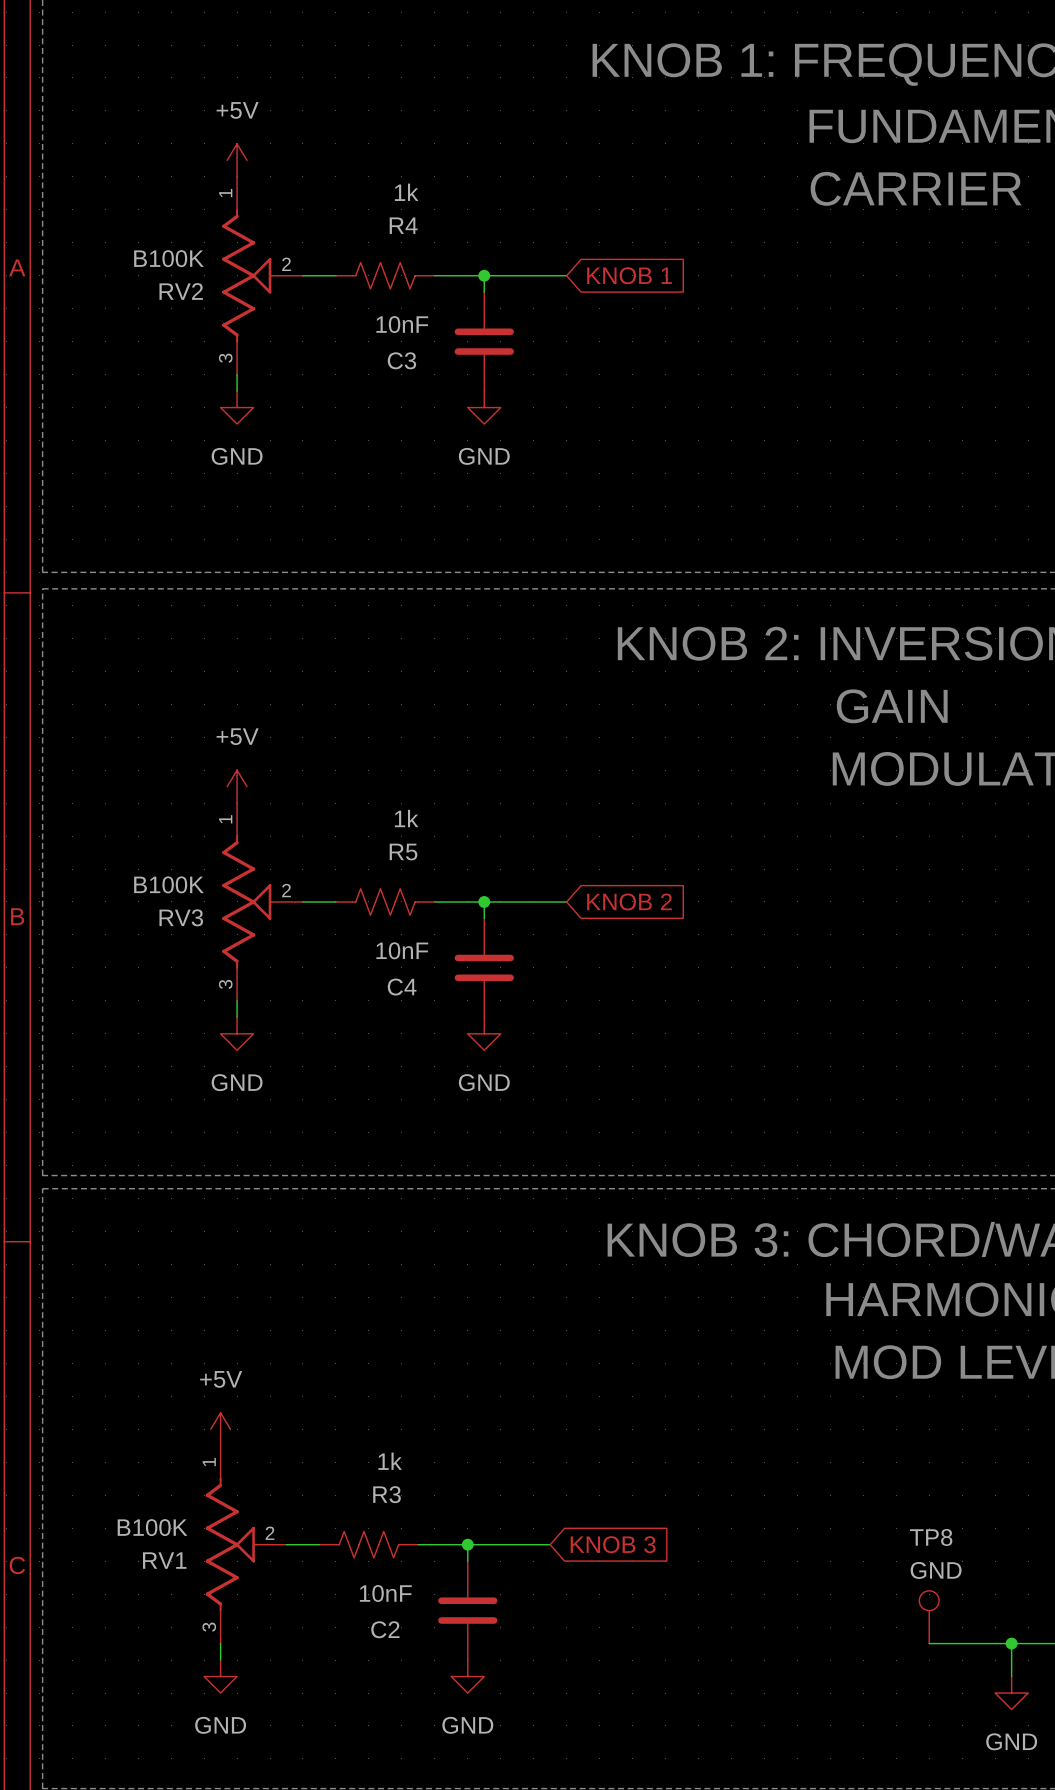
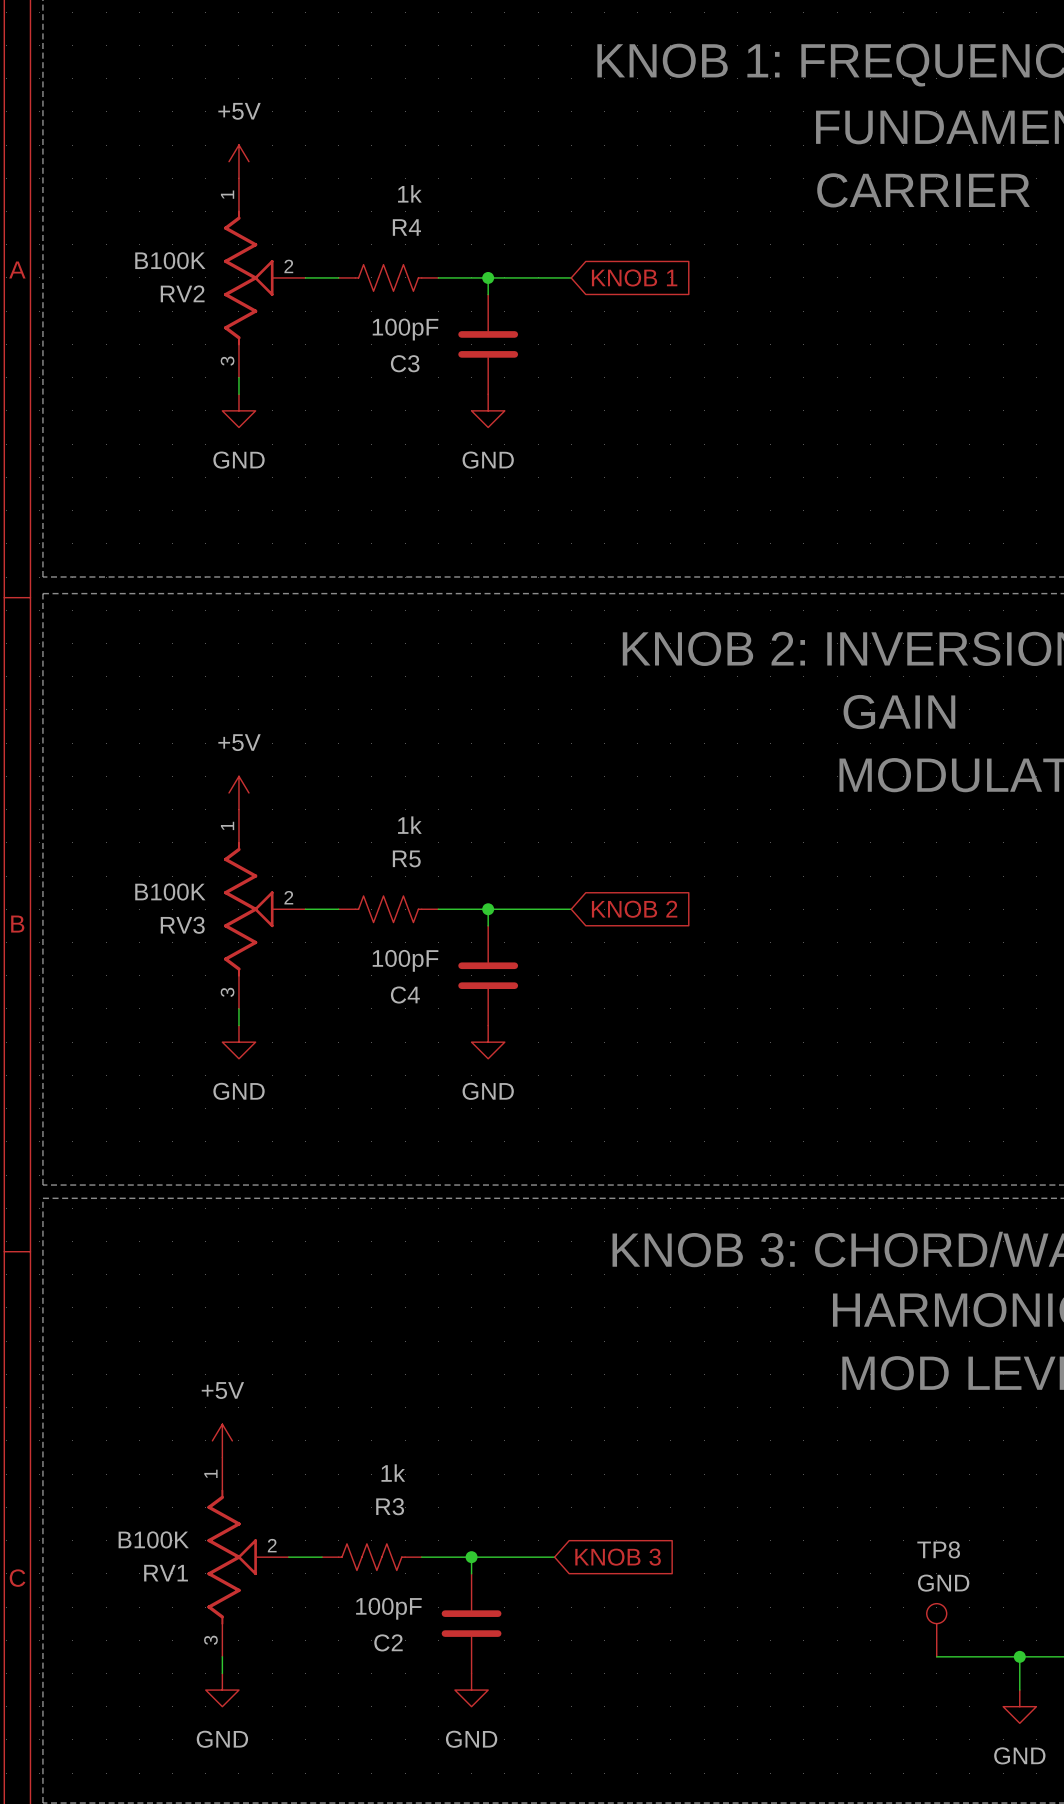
C3 value: 10nF (402, 324) -> 100pF (405, 329)
C4 value: 10nF (402, 950) -> 100pF (405, 960)
C2 value: 10nF (385, 1593) -> 100pF (388, 1608)

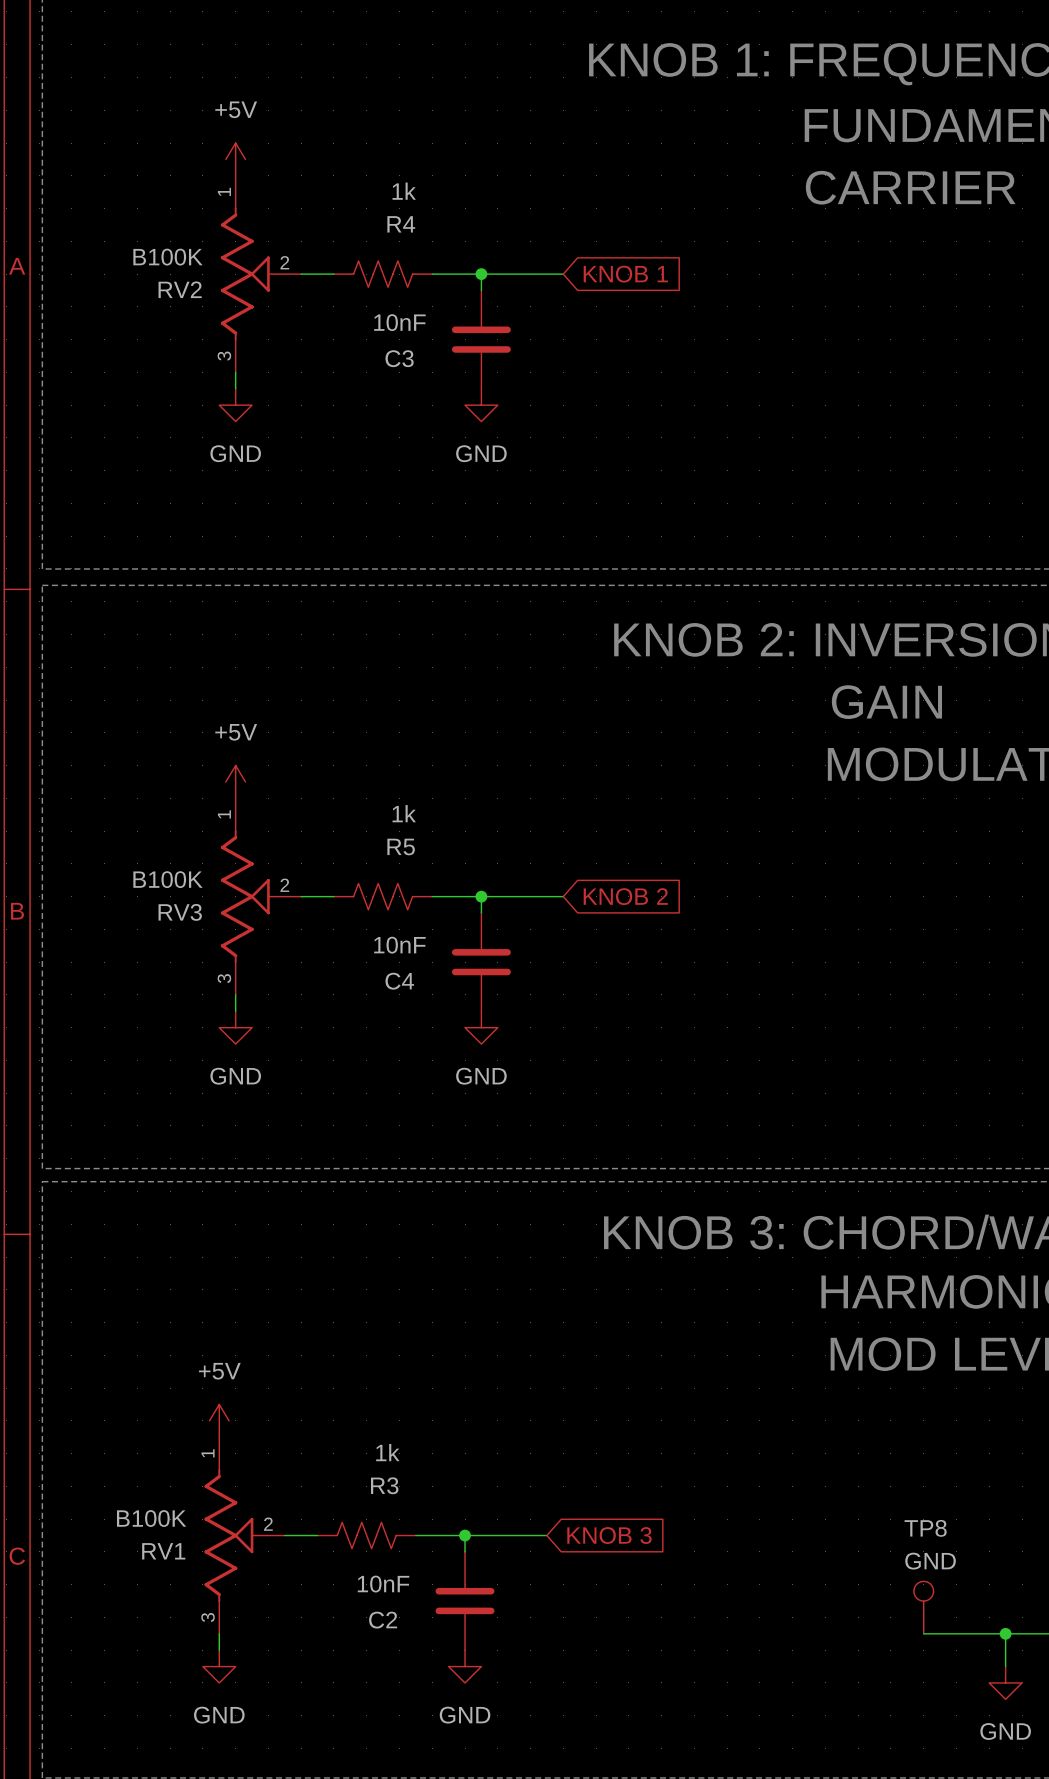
C3 value: 100pF (405, 329) -> 10nF (399, 322)
C4 value: 100pF (405, 960) -> 10nF (399, 945)
C2 value: 100pF (388, 1608) -> 10nF (383, 1584)

